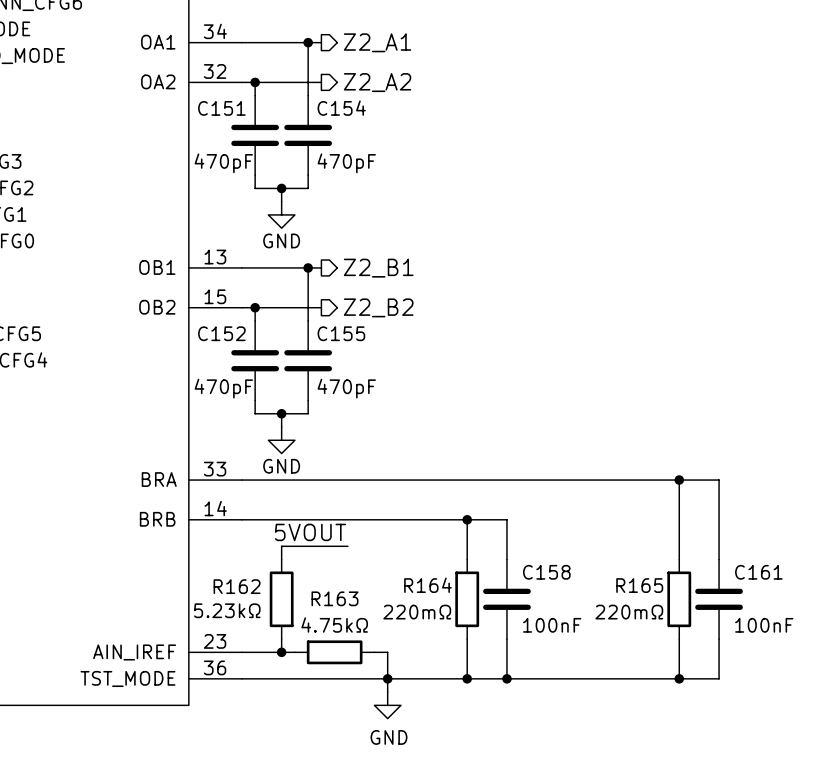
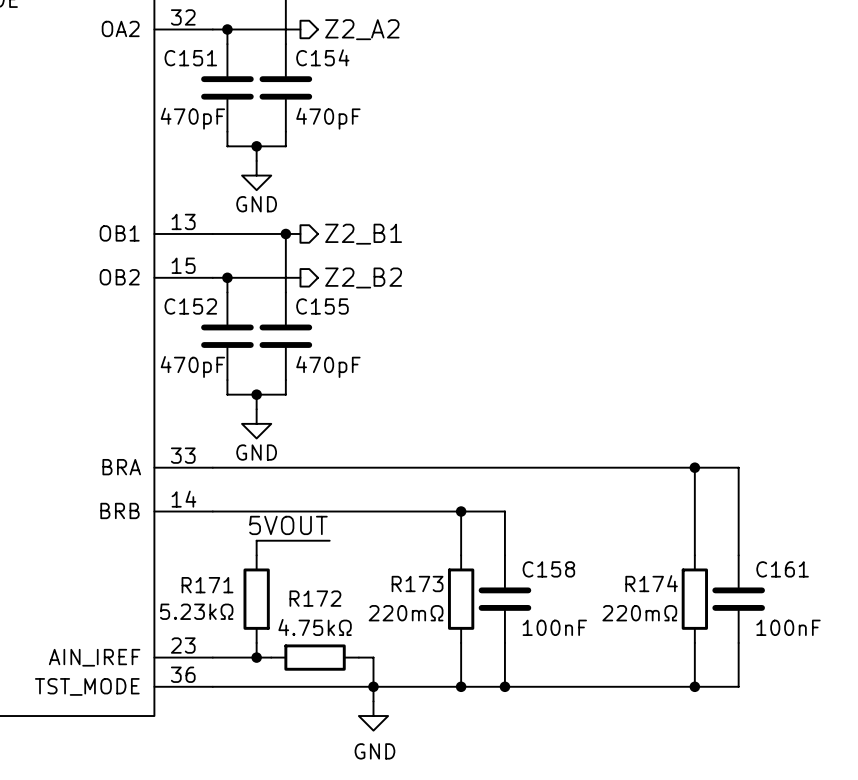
R164 name: R164 (427, 585) -> R173 (417, 584)
R165 name: R165 (639, 585) -> R174 (651, 583)
R162 name: R162 (237, 586) -> R171 (207, 585)
R163 name: R163 (334, 598) -> R172 (315, 598)

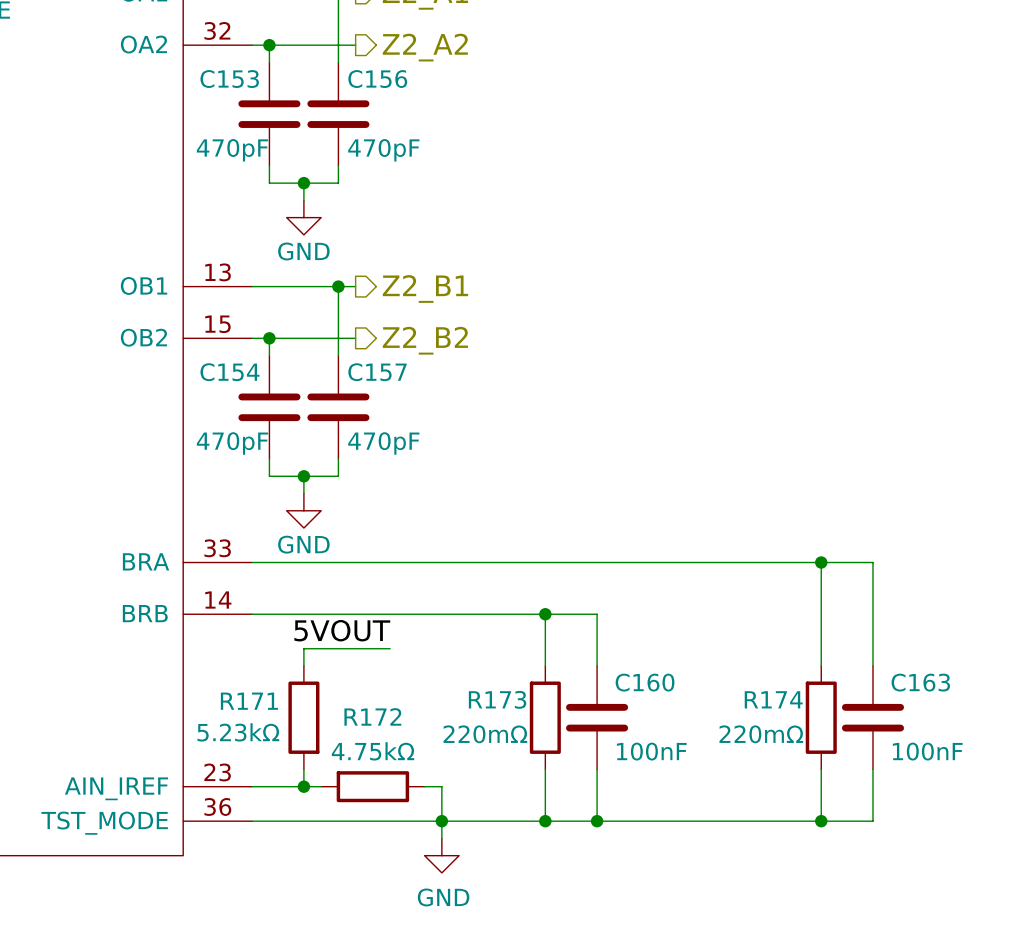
C154 name: C154 (322, 57) -> C156 (377, 79)
C151 name: C151 (190, 58) -> C153 (229, 79)
C152 name: C152 (190, 306) -> C154 (229, 372)
C155 name: C155 (322, 306) -> C157 (377, 372)
C158 name: C158 (548, 569) -> C160 (645, 682)
C161 name: C161 (782, 569) -> C163 (920, 682)

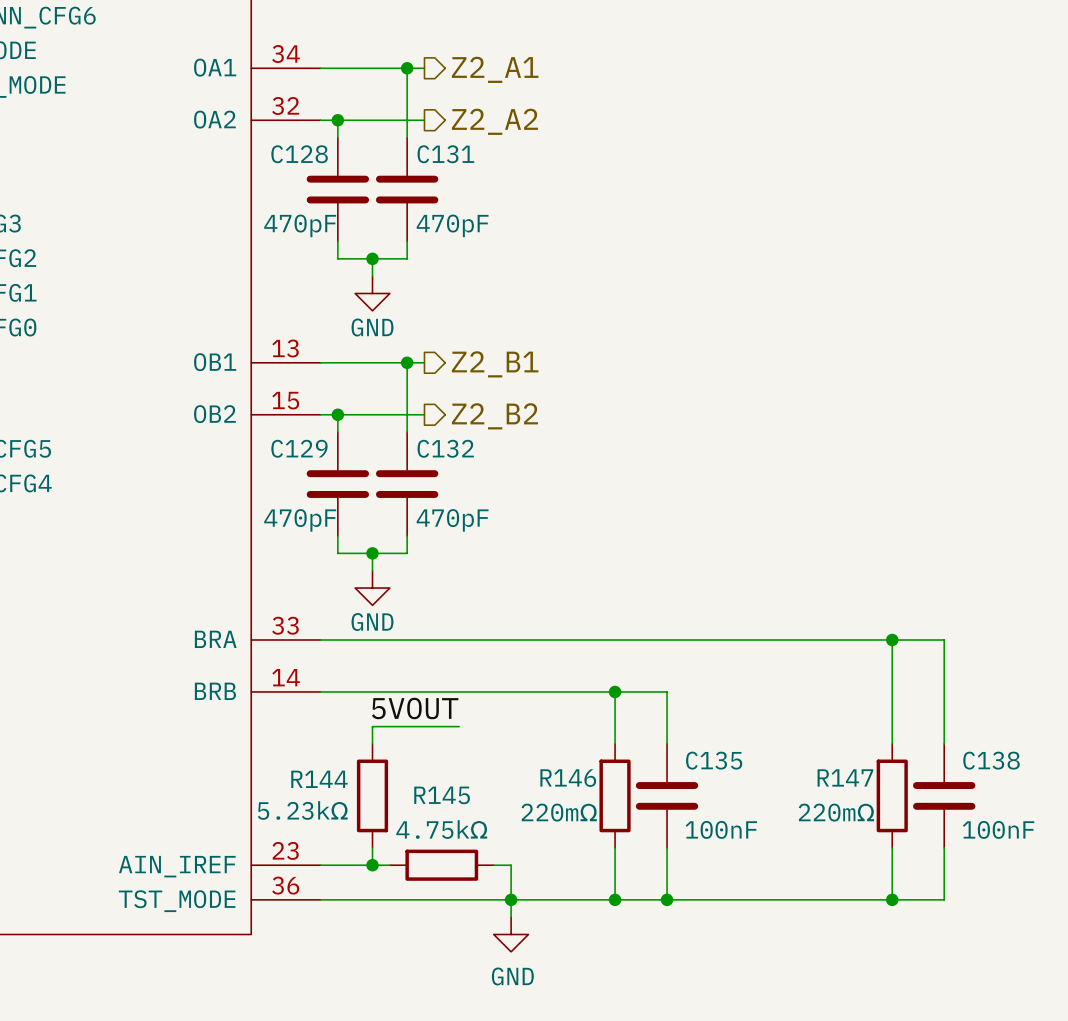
C153 name: C153 (229, 79) -> C128 (299, 154)
C156 name: C156 (377, 79) -> C131 (445, 154)
C154 name: C154 (229, 372) -> C129 (299, 448)
C157 name: C157 (377, 372) -> C132 (445, 448)
C160 name: C160 (645, 682) -> C135 (714, 760)
C163 name: C163 (920, 682) -> C138 (991, 760)
R173 name: R173 (497, 699) -> R146 (568, 778)
R174 name: R174 (773, 699) -> R147 (845, 777)
R171 name: R171 (249, 701) -> R144 (319, 779)
R172 name: R172 (372, 716) -> R145 (442, 795)

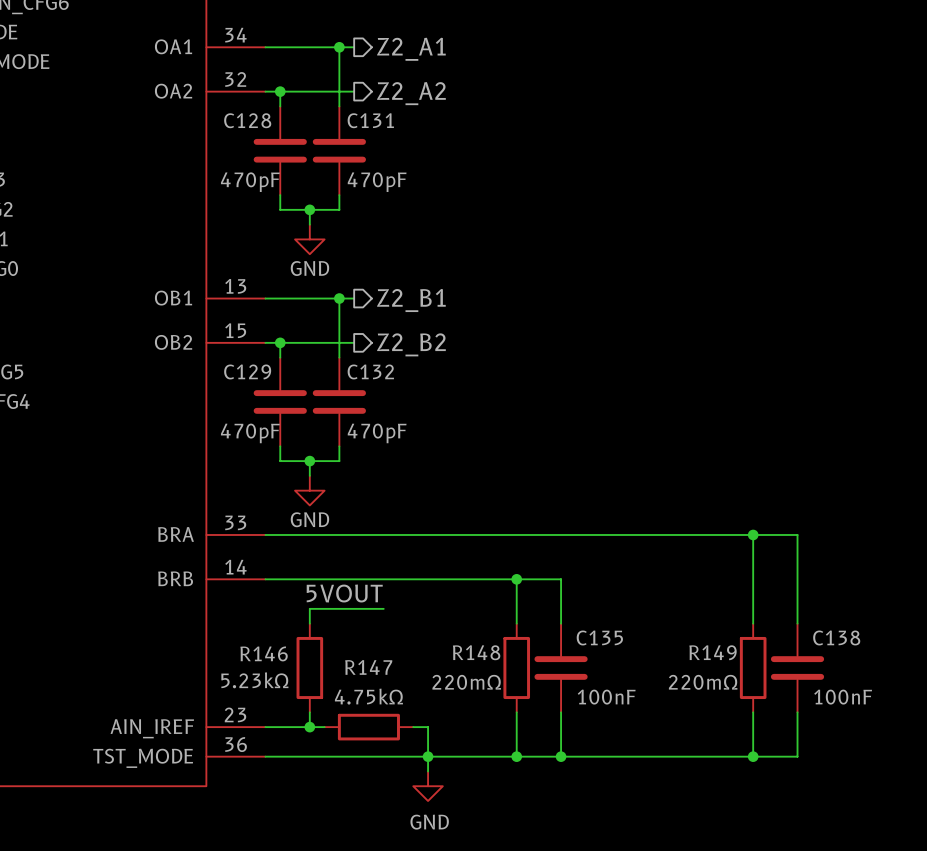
R147 name: R147 (845, 777) -> R149 (713, 652)
R146 name: R146 (568, 778) -> R148 (476, 652)
R144 name: R144 (319, 779) -> R146 (264, 653)
R145 name: R145 (442, 795) -> R147 (368, 667)

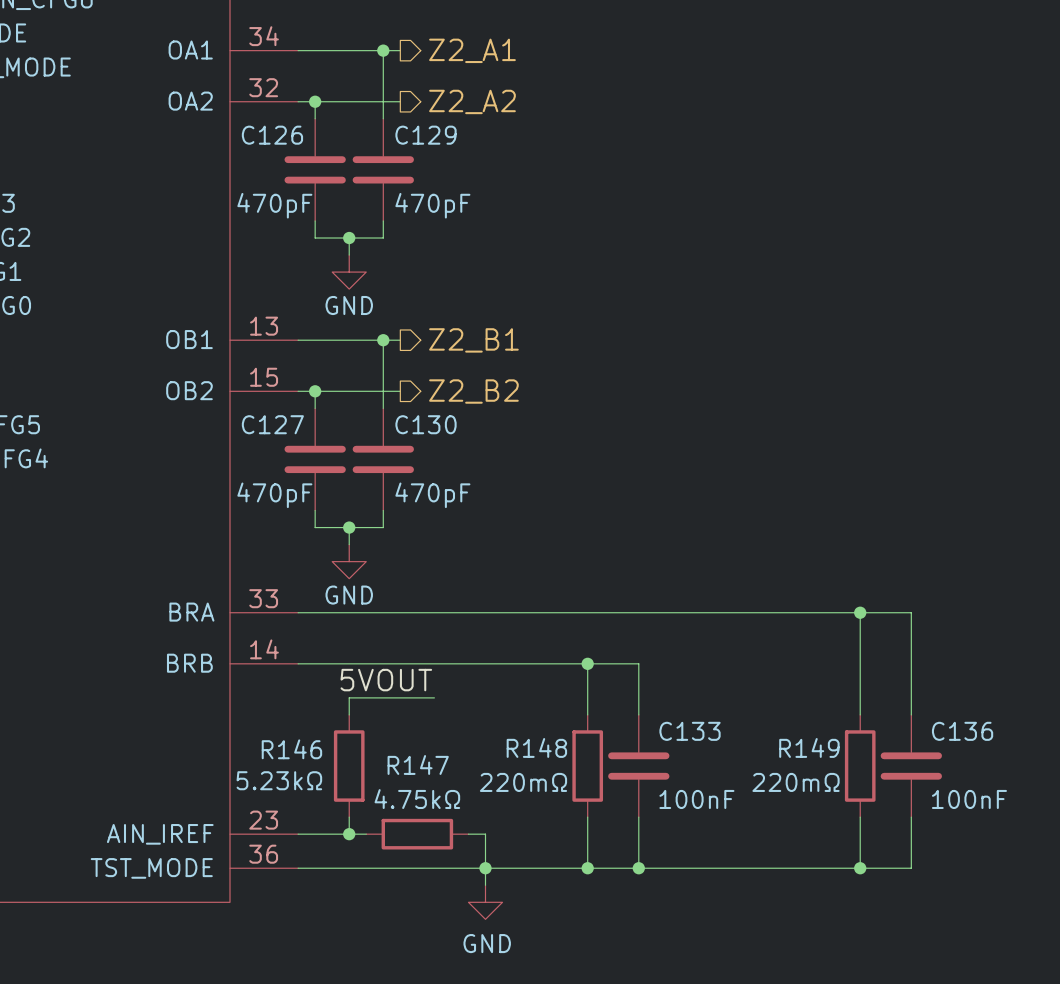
C128 name: C128 (247, 120) -> C126 (272, 135)
C131 name: C131 (370, 120) -> C129 (426, 135)
C129 name: C129 (247, 371) -> C127 (272, 424)
C132 name: C132 (370, 371) -> C130 (426, 424)
C135 name: C135 (599, 637) -> C133 (690, 731)
C138 name: C138 (836, 637) -> C136 (962, 731)

